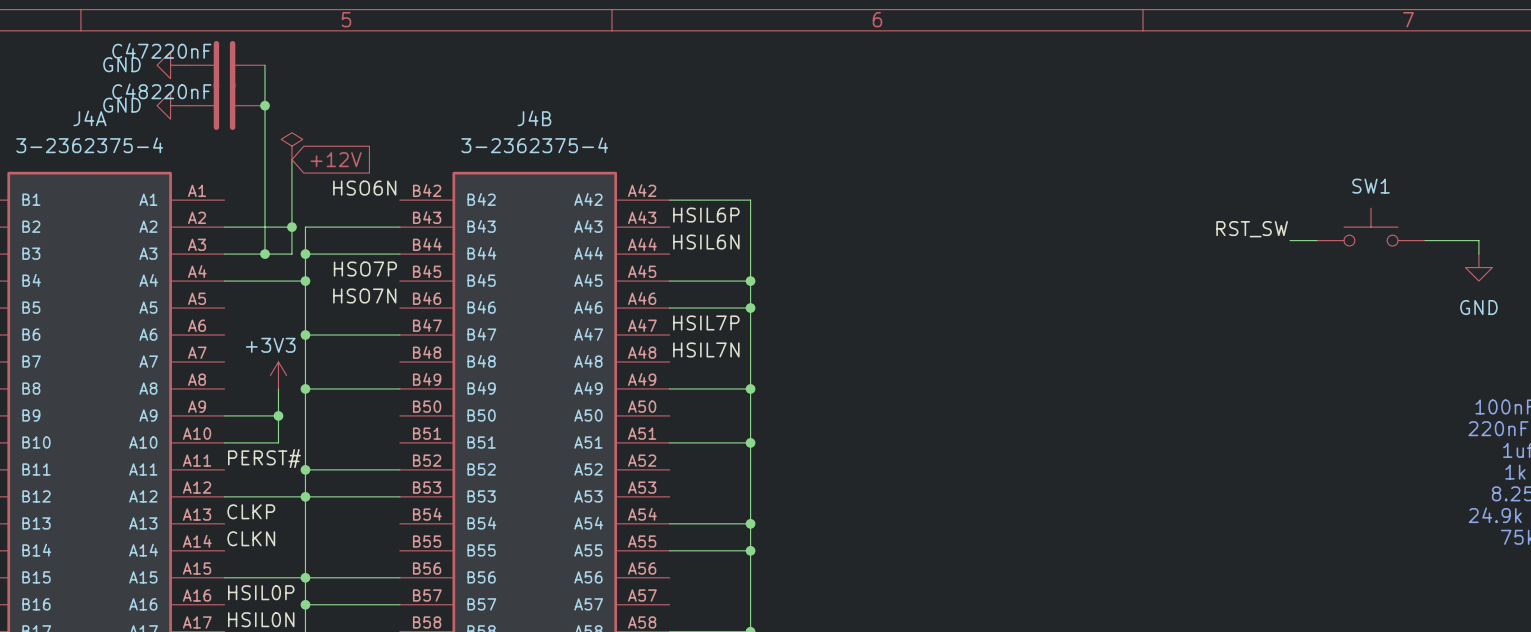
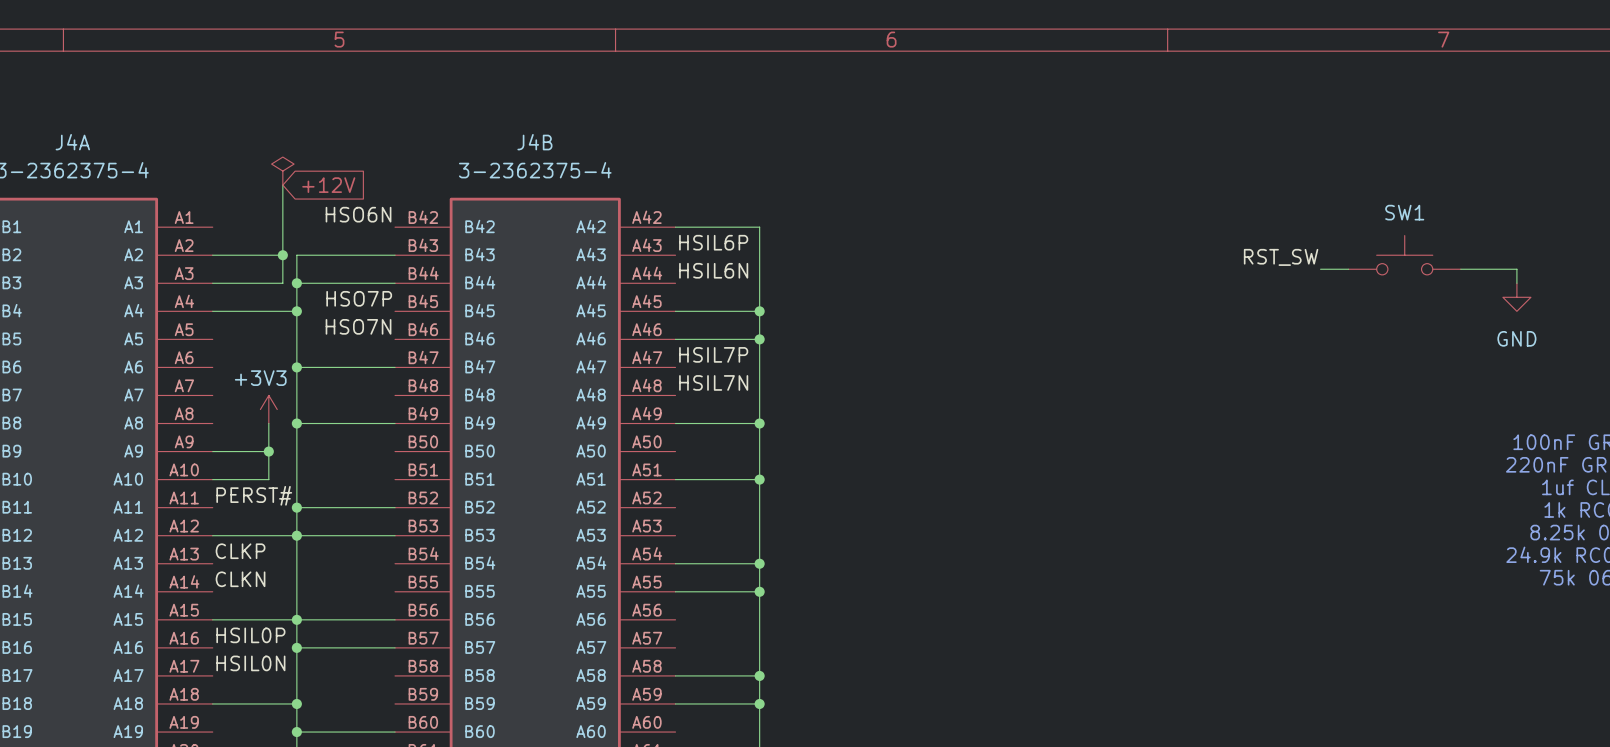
power symbol: GND (170, 65) -> none
C47: 220nF (224, 65) -> none
wire: (264, 65) (264, 254) -> none
power symbol: GND (170, 105) -> none
C48: 220nF (224, 105) -> none
junction: (264, 105) -> none
junction: (264, 254) -> none

